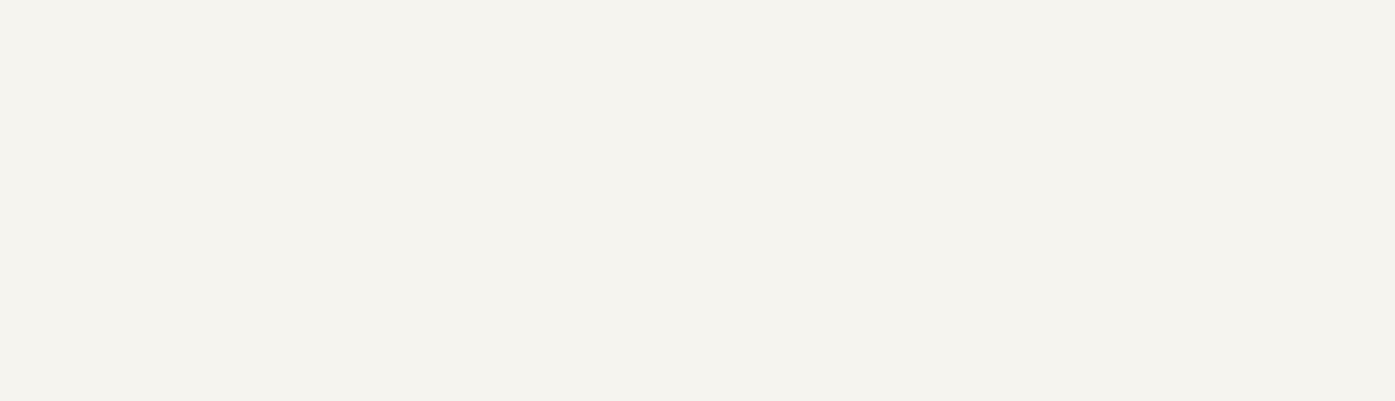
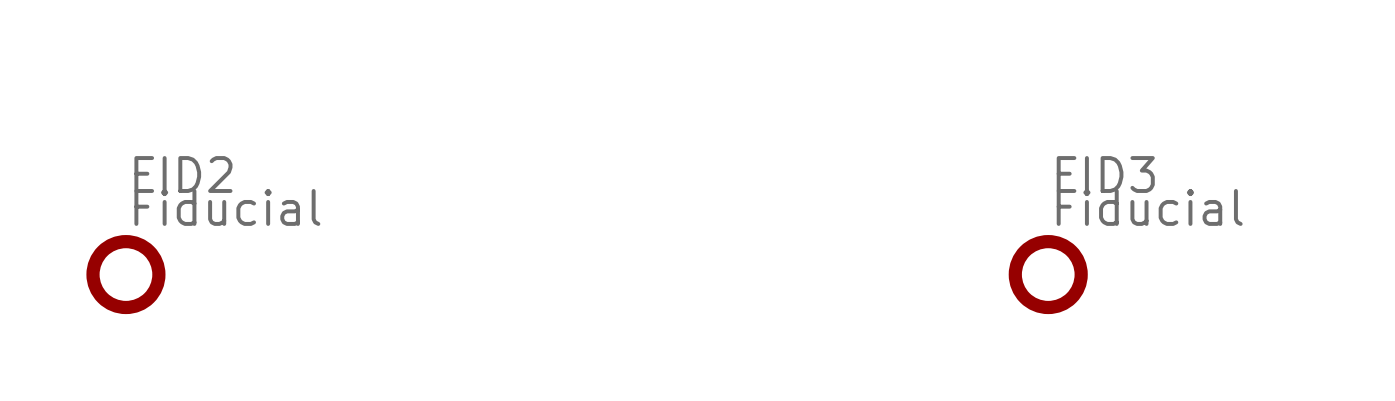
FID2: none -> Fiducial (125, 274)
FID3: none -> Fiducial (1048, 274)

